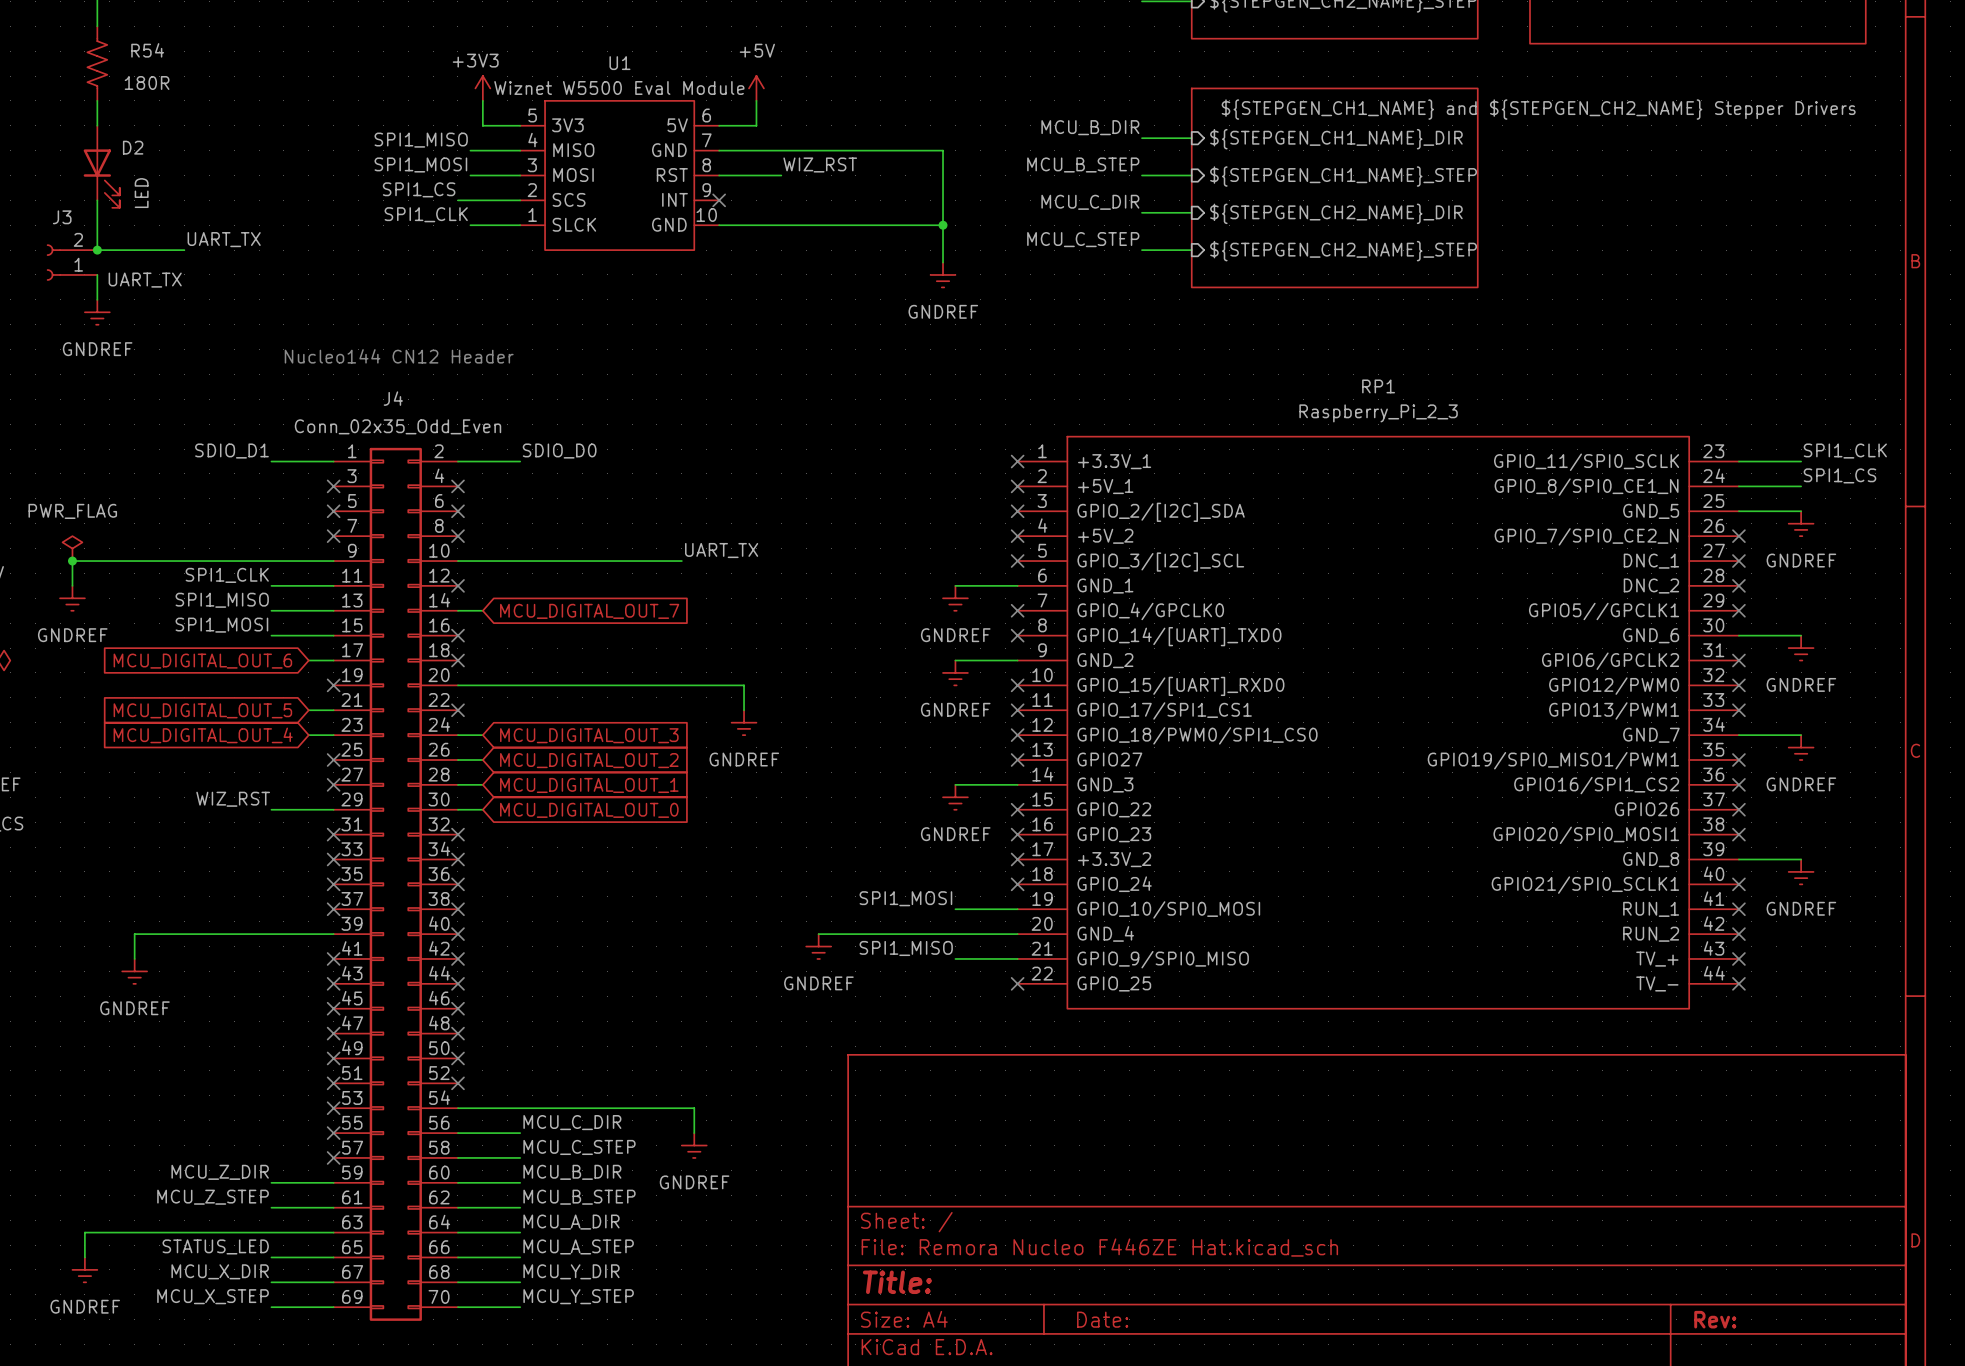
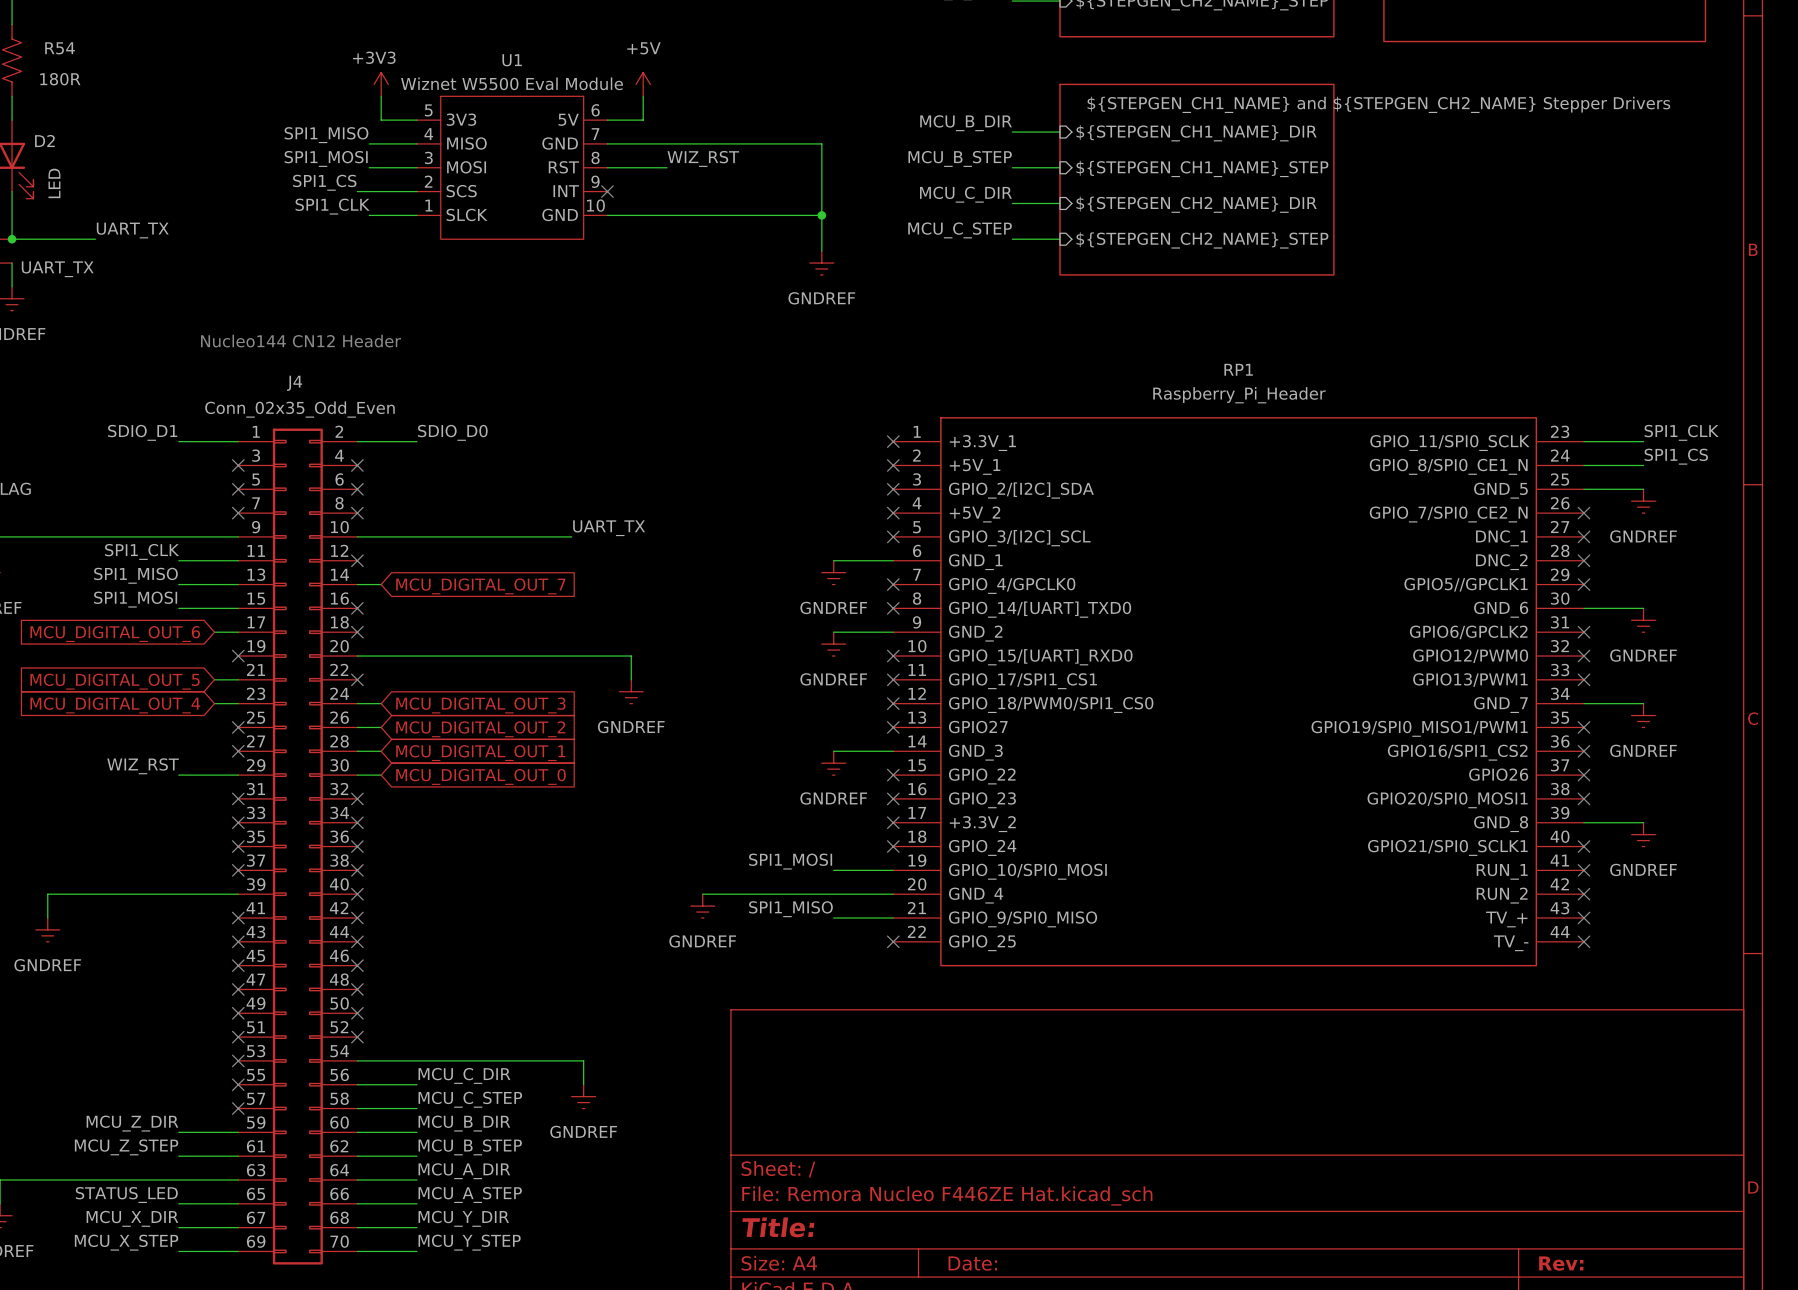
RP1 value: Raspberry_Pi_2_3 (1378, 413) -> Raspberry_Pi_Header (1239, 395)

